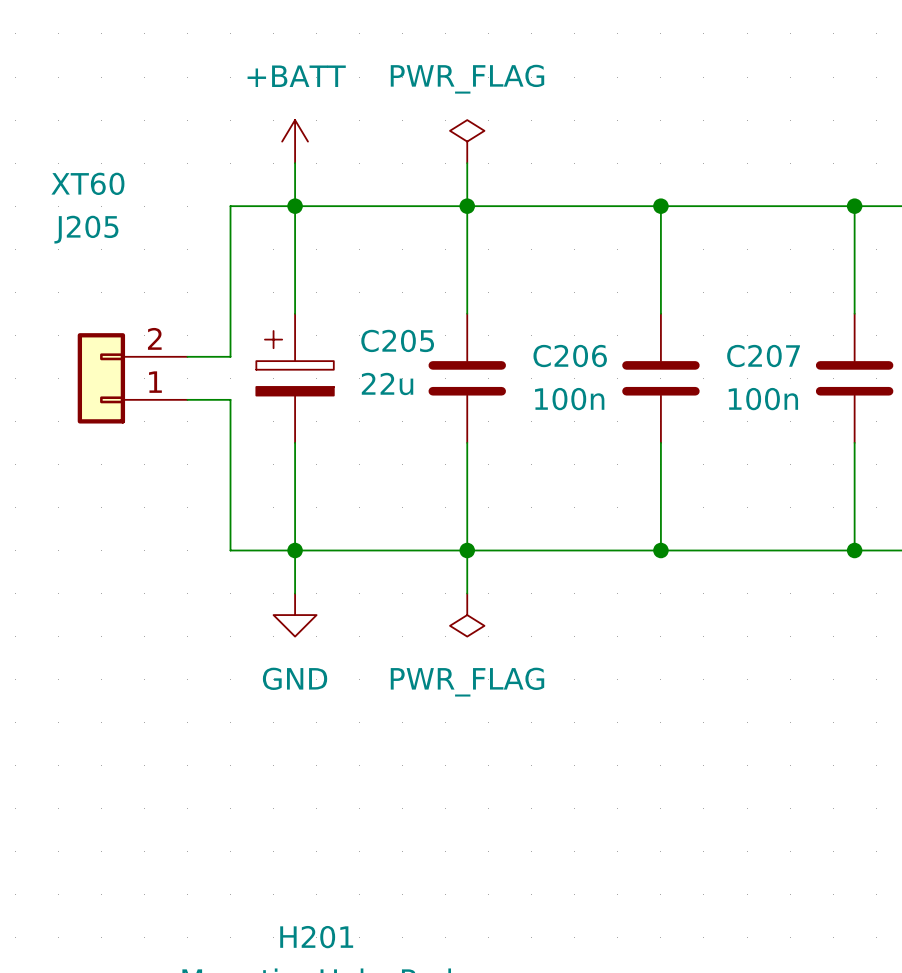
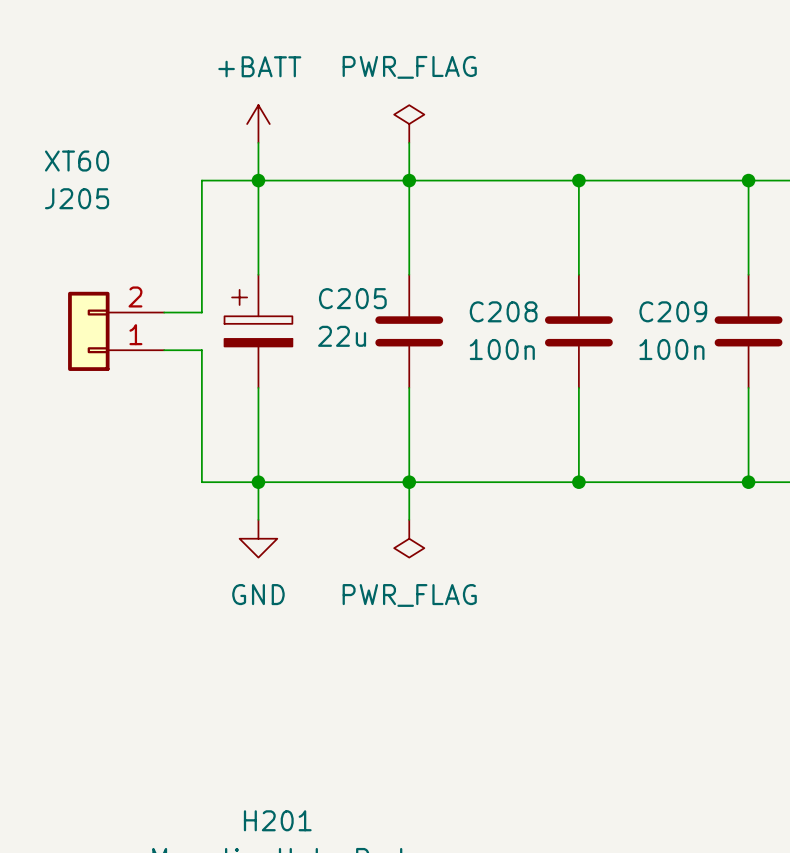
C206 name: C206 (570, 356) -> C208 (503, 311)
C207 name: C207 (763, 356) -> C209 (673, 311)

